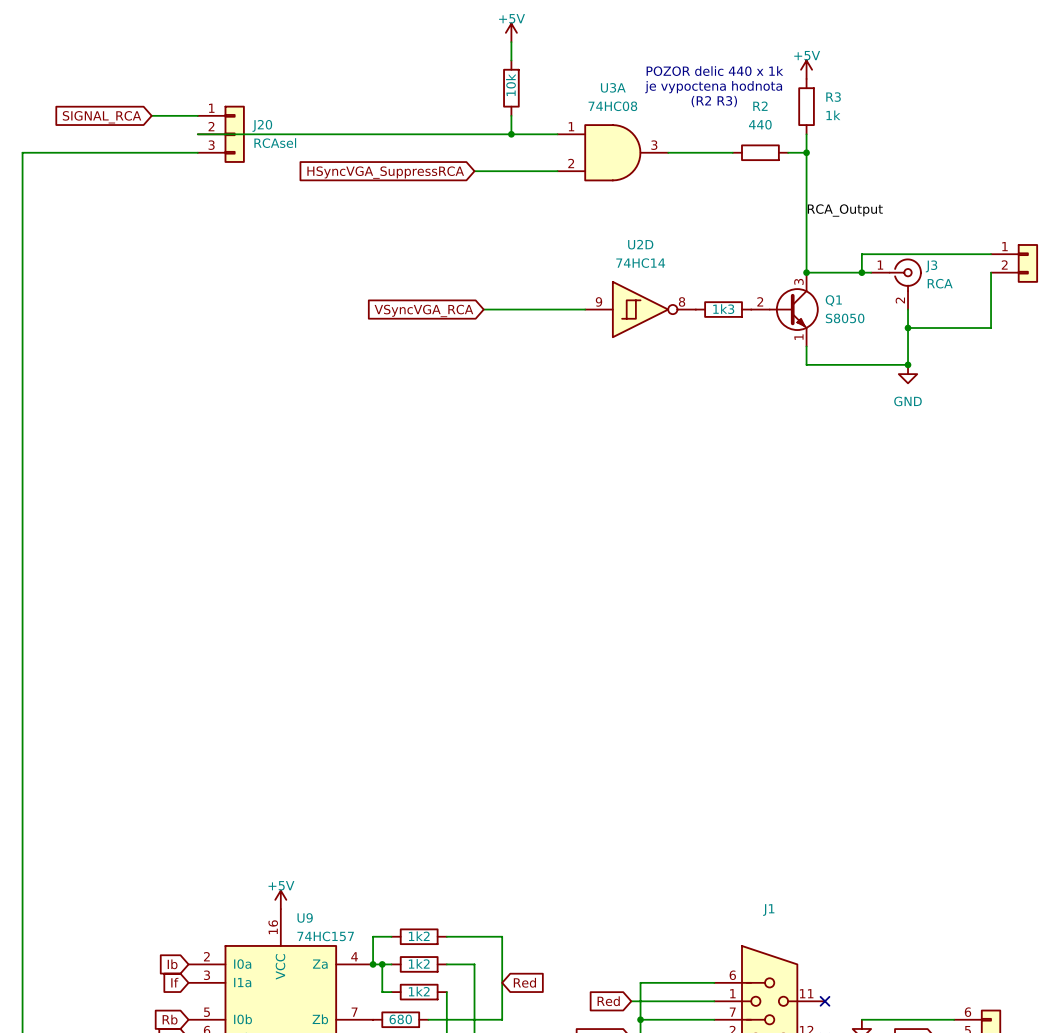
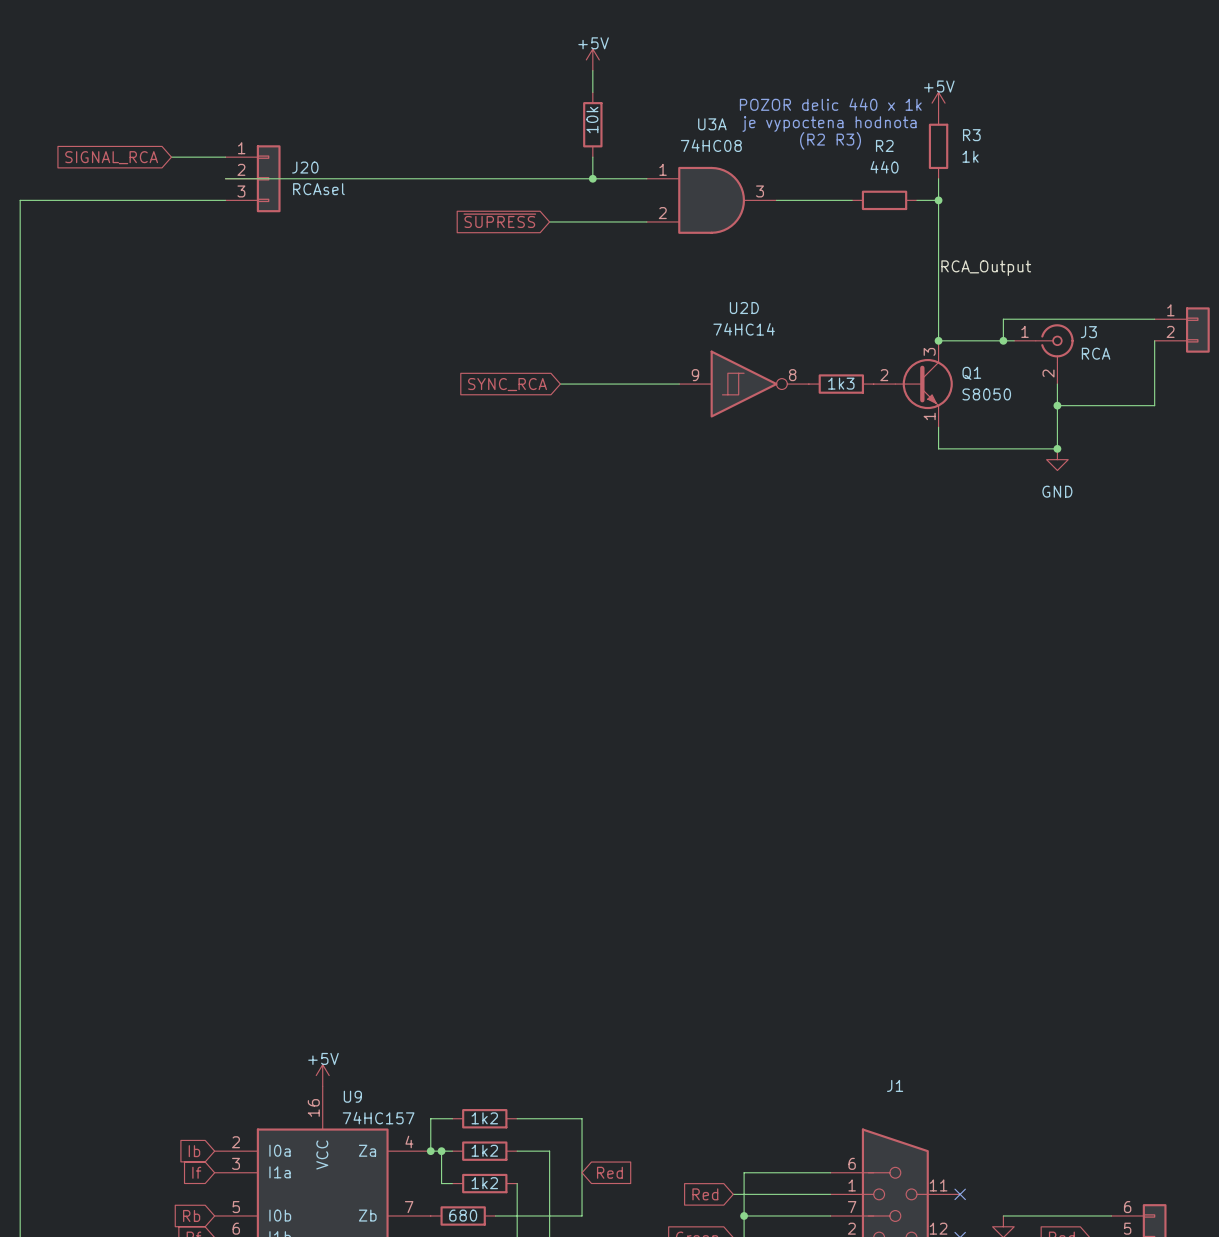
global label: HSyncVGA_SuppressRCA (385, 172) -> ~{SUPRESS} (499, 220)
global label: VSyncVGA_RCA (423, 310) -> SYNC_RCA (507, 384)

